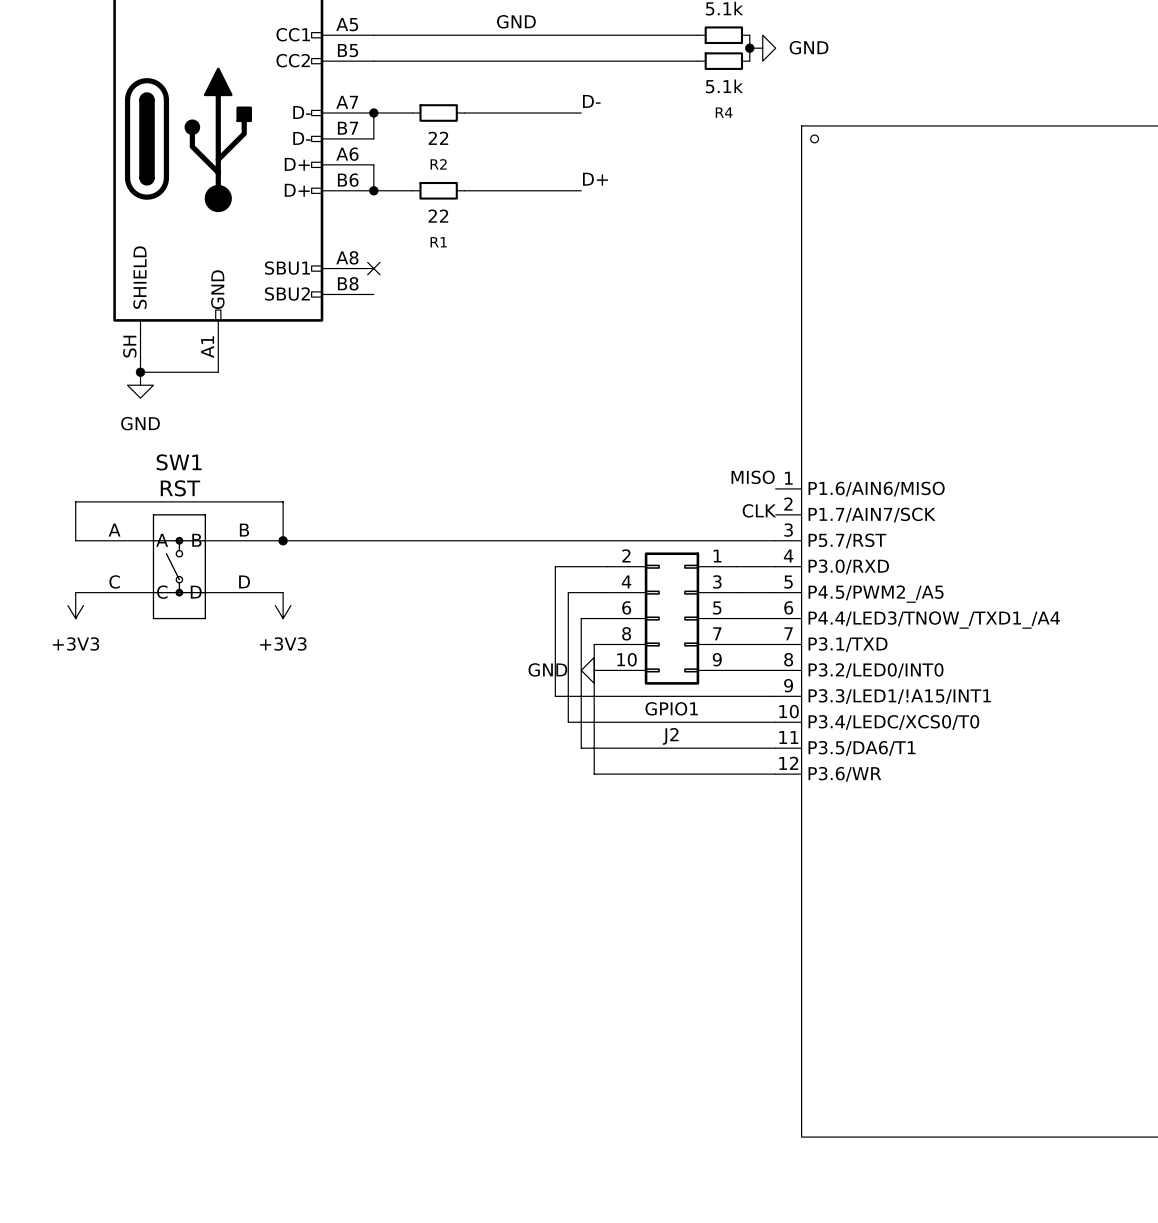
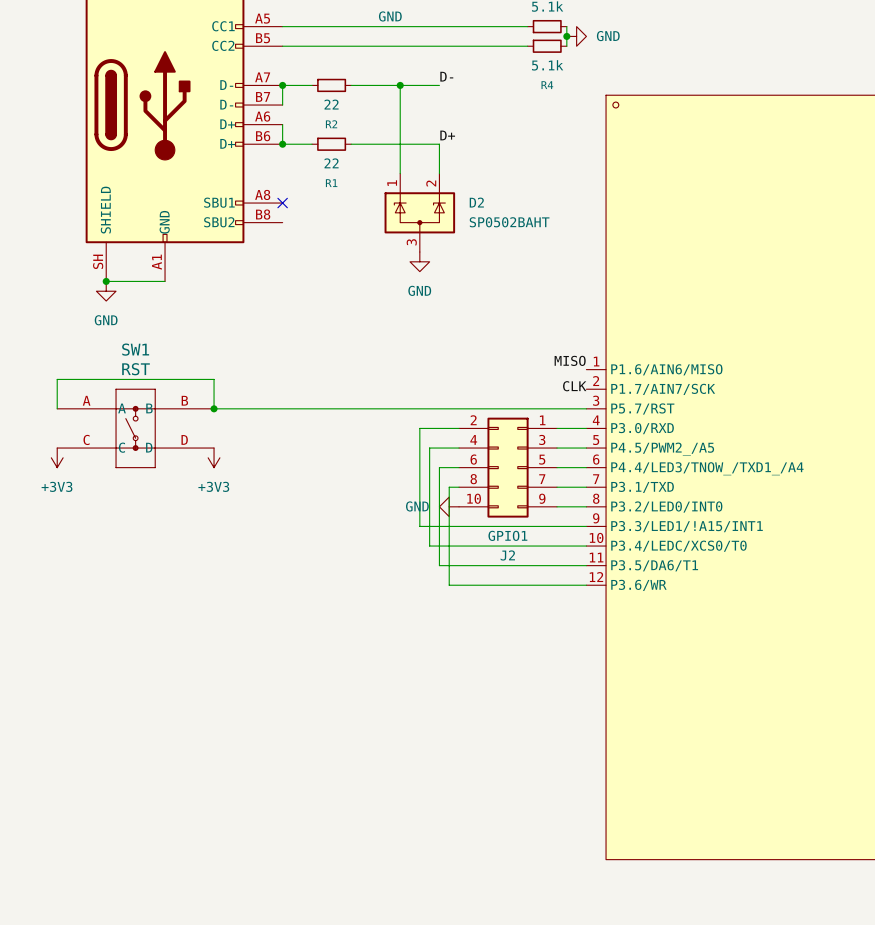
wire: none -> (400, 85) (400, 173)
junction: none -> (400, 85)
wire: none -> (439, 144) (439, 173)
D2: none -> SP0502BAHT (419, 212)
power symbol: none -> GND (419, 261)

